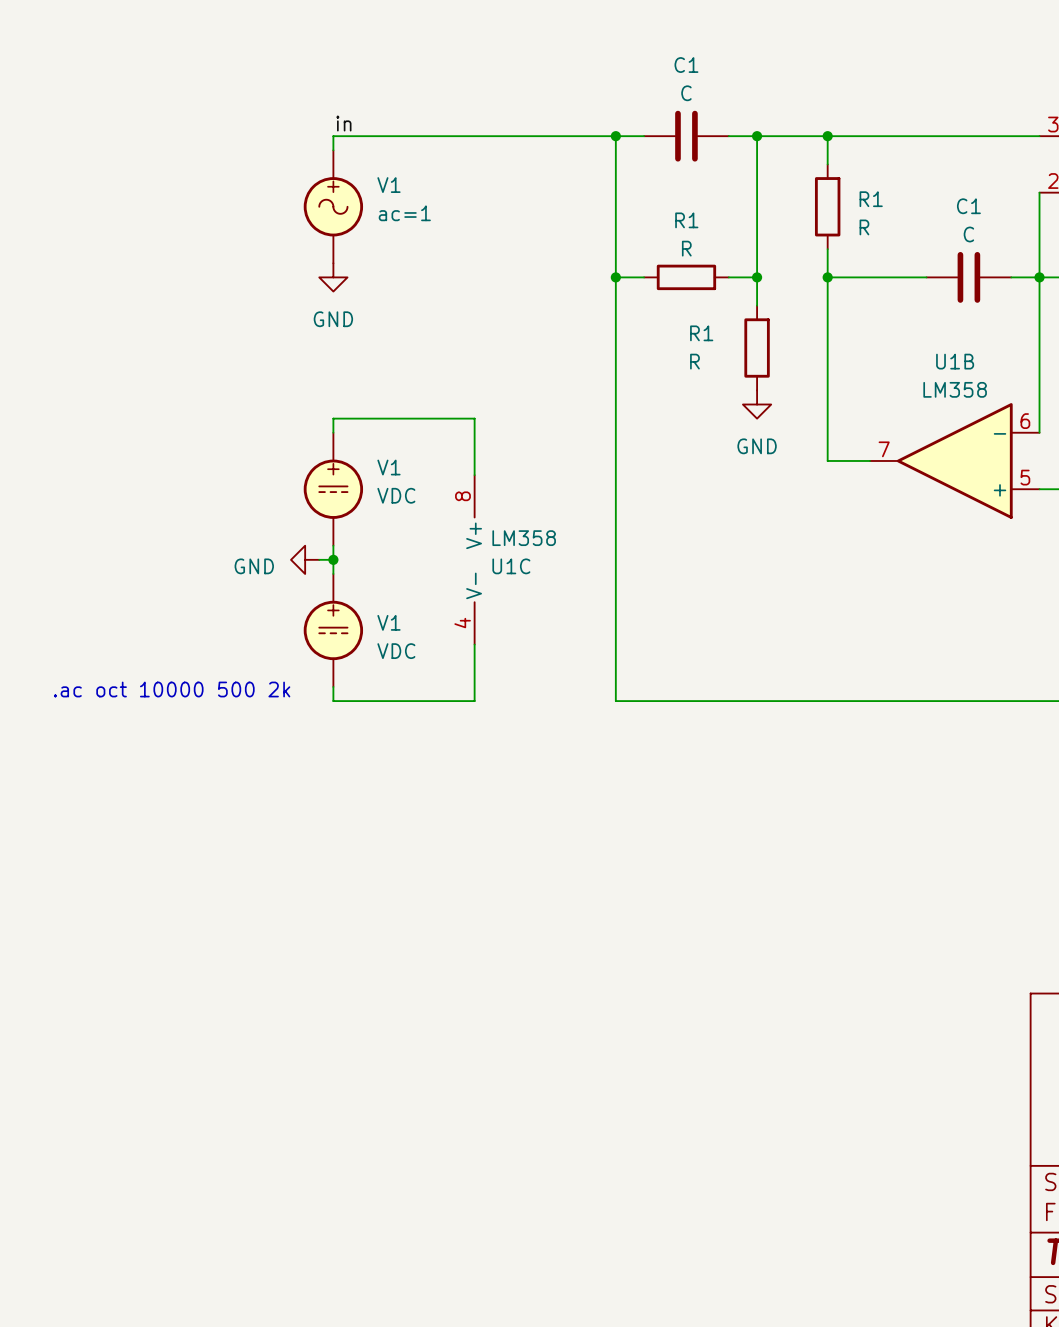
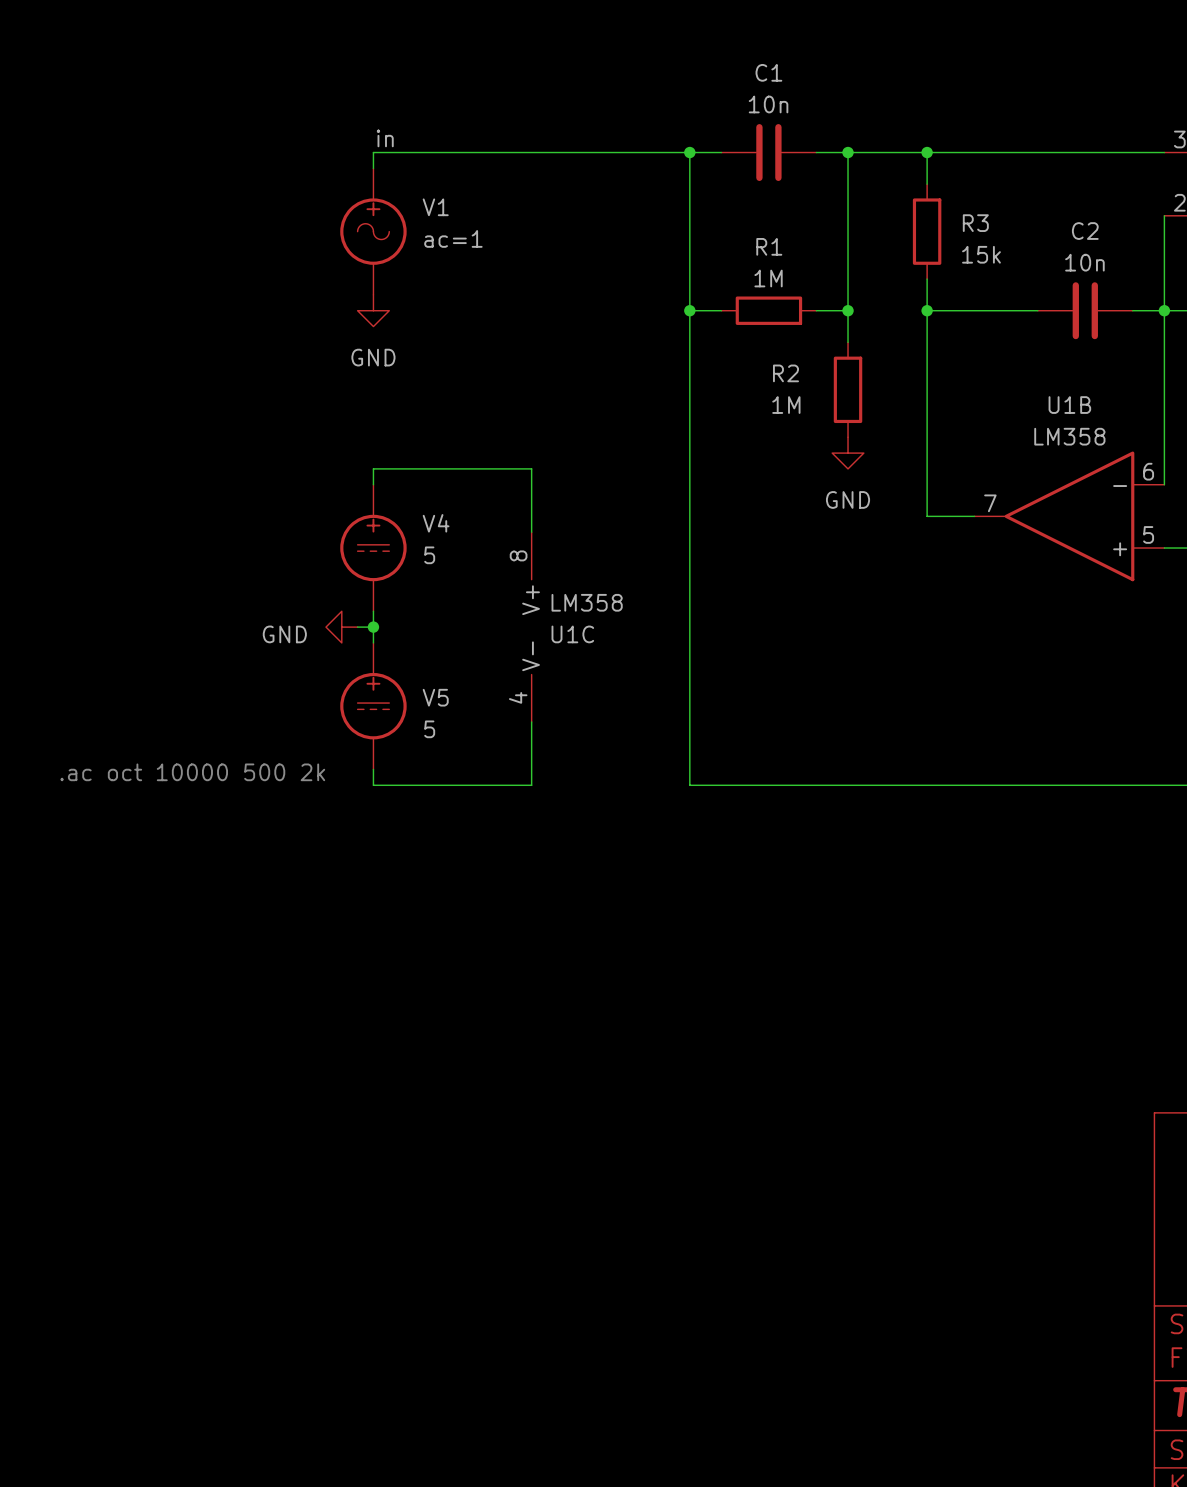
C1 value: C (686, 93) -> 10n (768, 104)
R1 name: R1 (871, 199) -> R3 (975, 223)
C1 name: C1 (968, 206) -> C2 (1085, 231)
R1 value: R (864, 227) -> 15k (981, 254)
C1 value: C (968, 234) -> 10n (1084, 262)
R1 value: R (686, 248) -> 1M (768, 278)
R1 name: R1 (701, 333) -> R2 (785, 373)
R1 value: R (694, 361) -> 1M (786, 405)
V1 name: V1 (388, 467) -> V4 (436, 523)
V1 value: VDC (396, 495) -> 5 (429, 555)
V1 name: V1 (388, 622) -> V5 (435, 697)
V1 value: VDC (396, 651) -> 5 (429, 729)

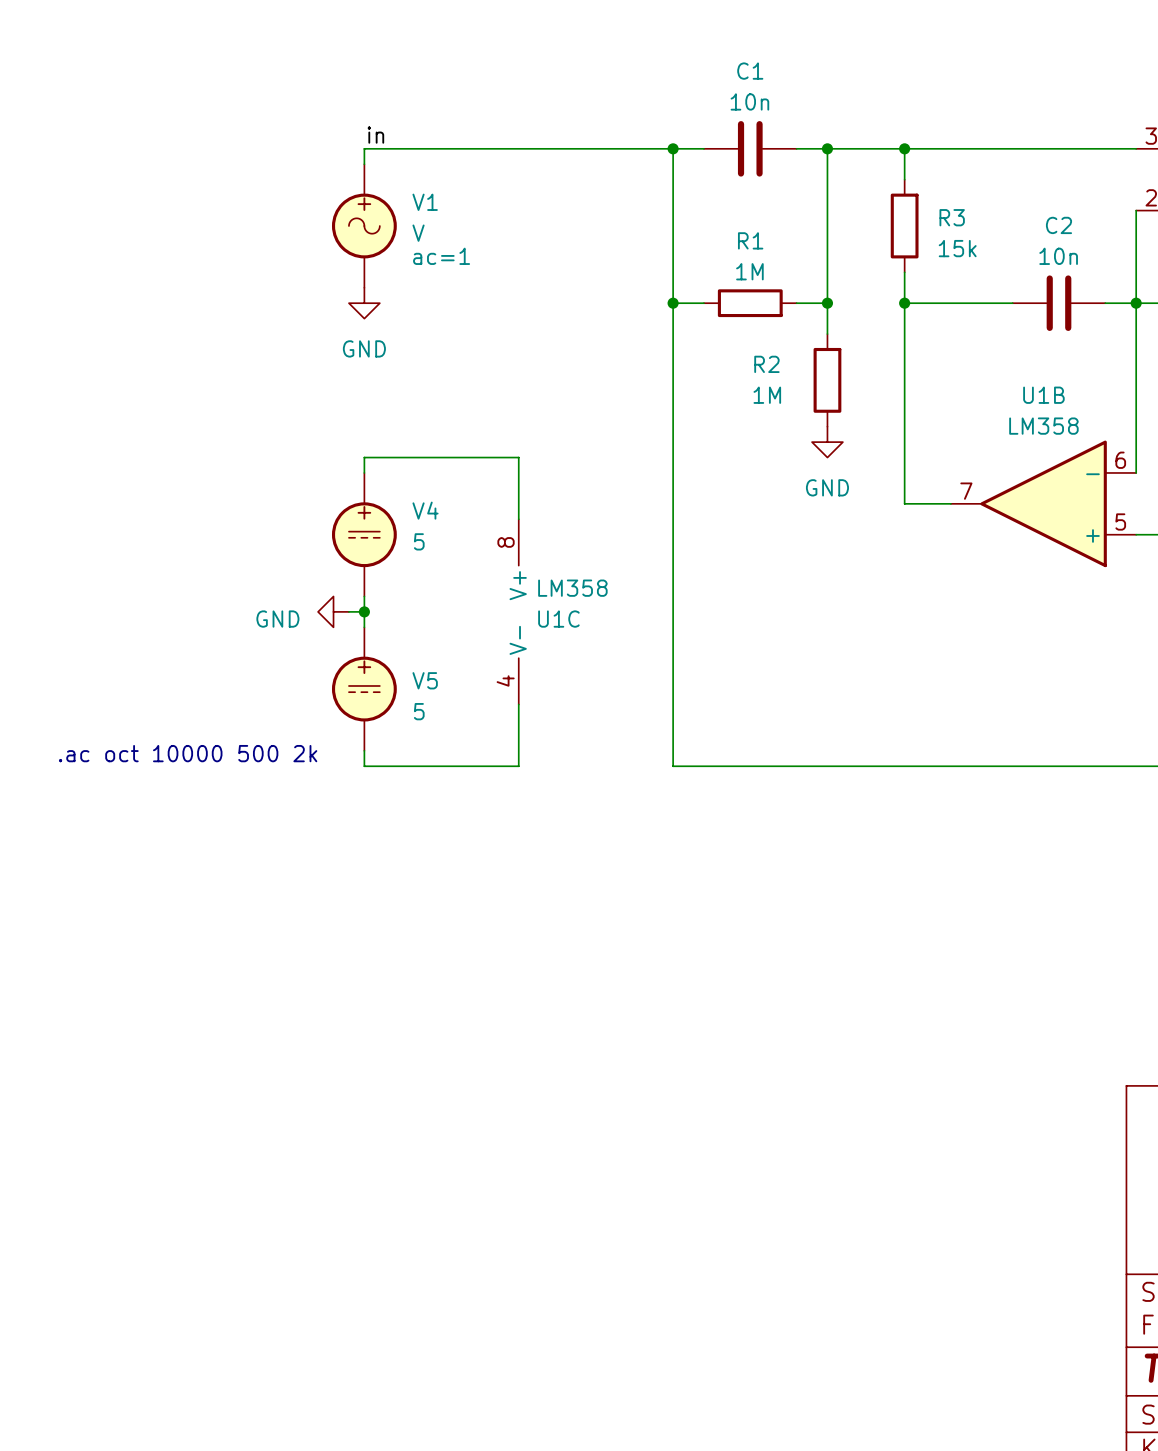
V1 value: ac=1 (453, 238) -> V (418, 233)
V1 text: none -> ac=1 (441, 256)

